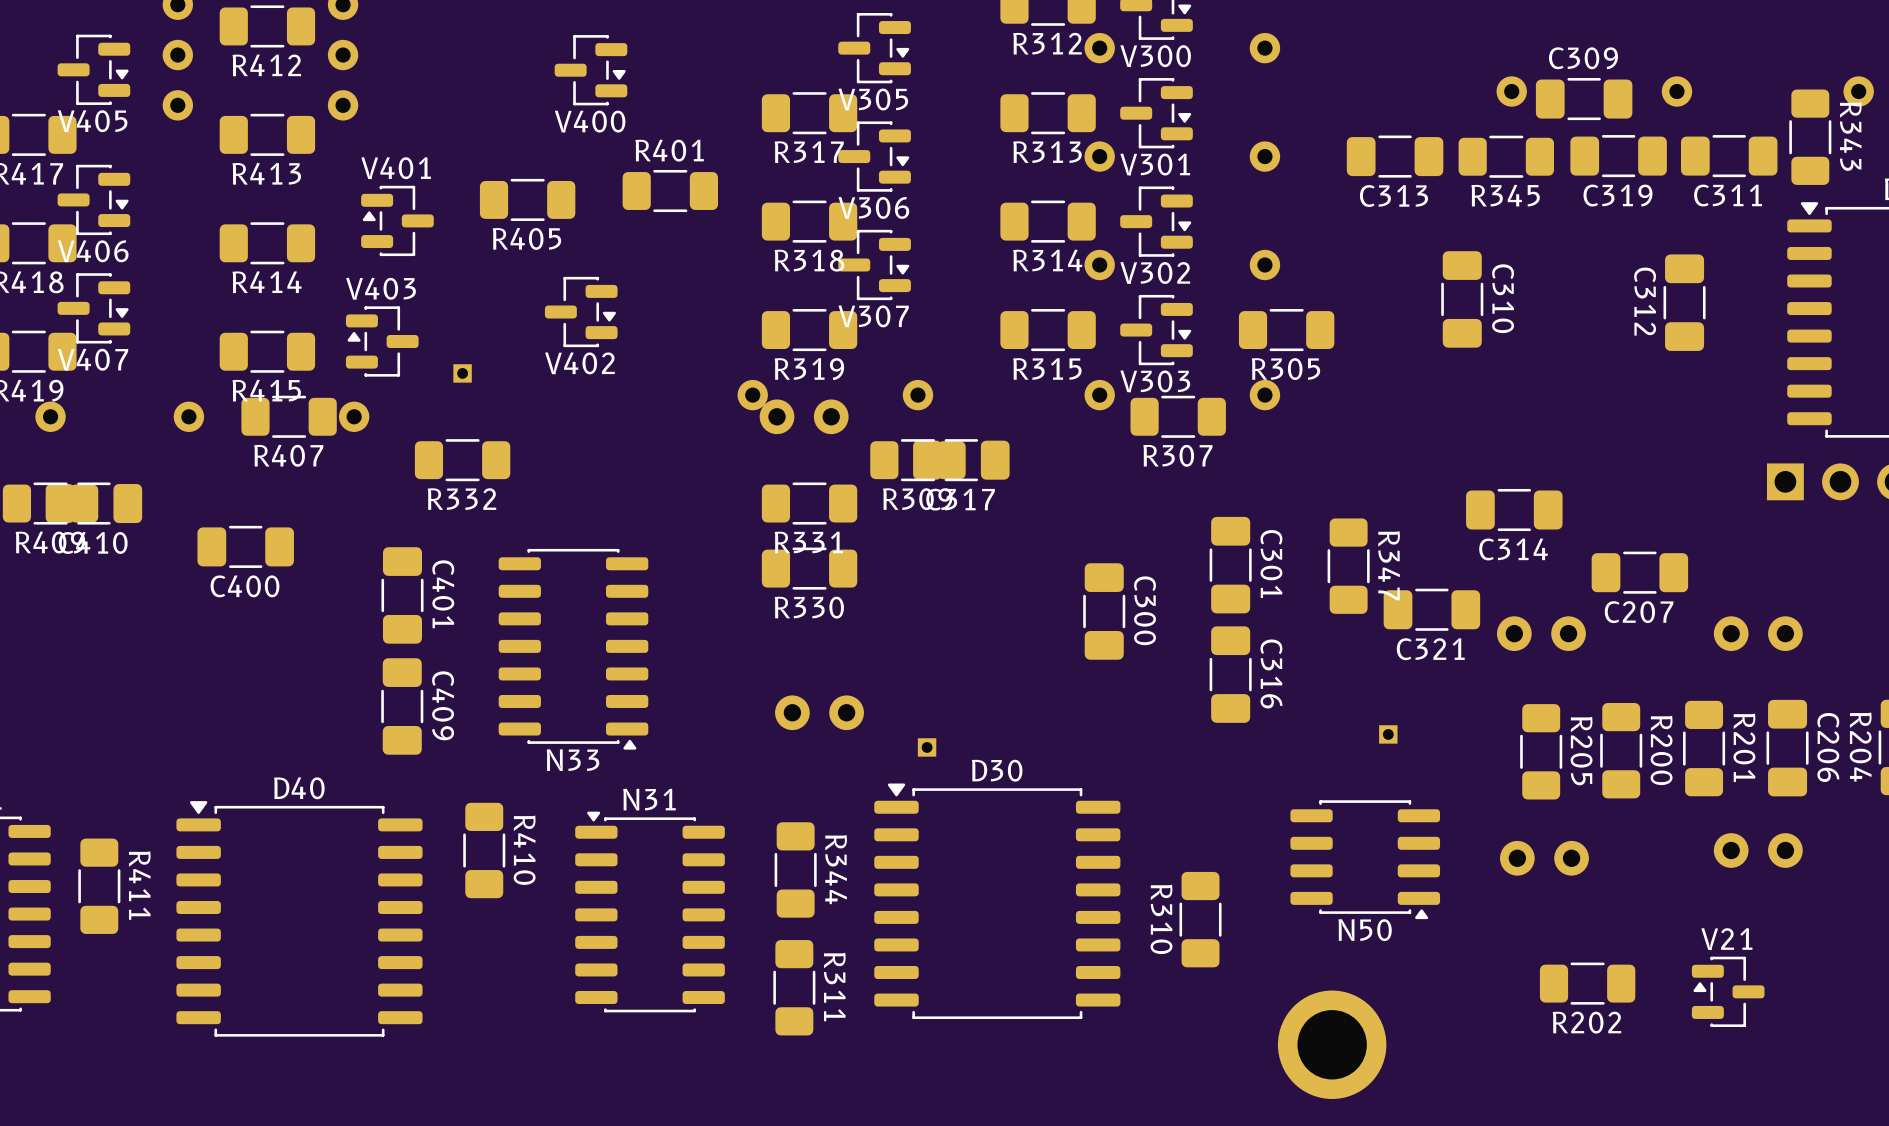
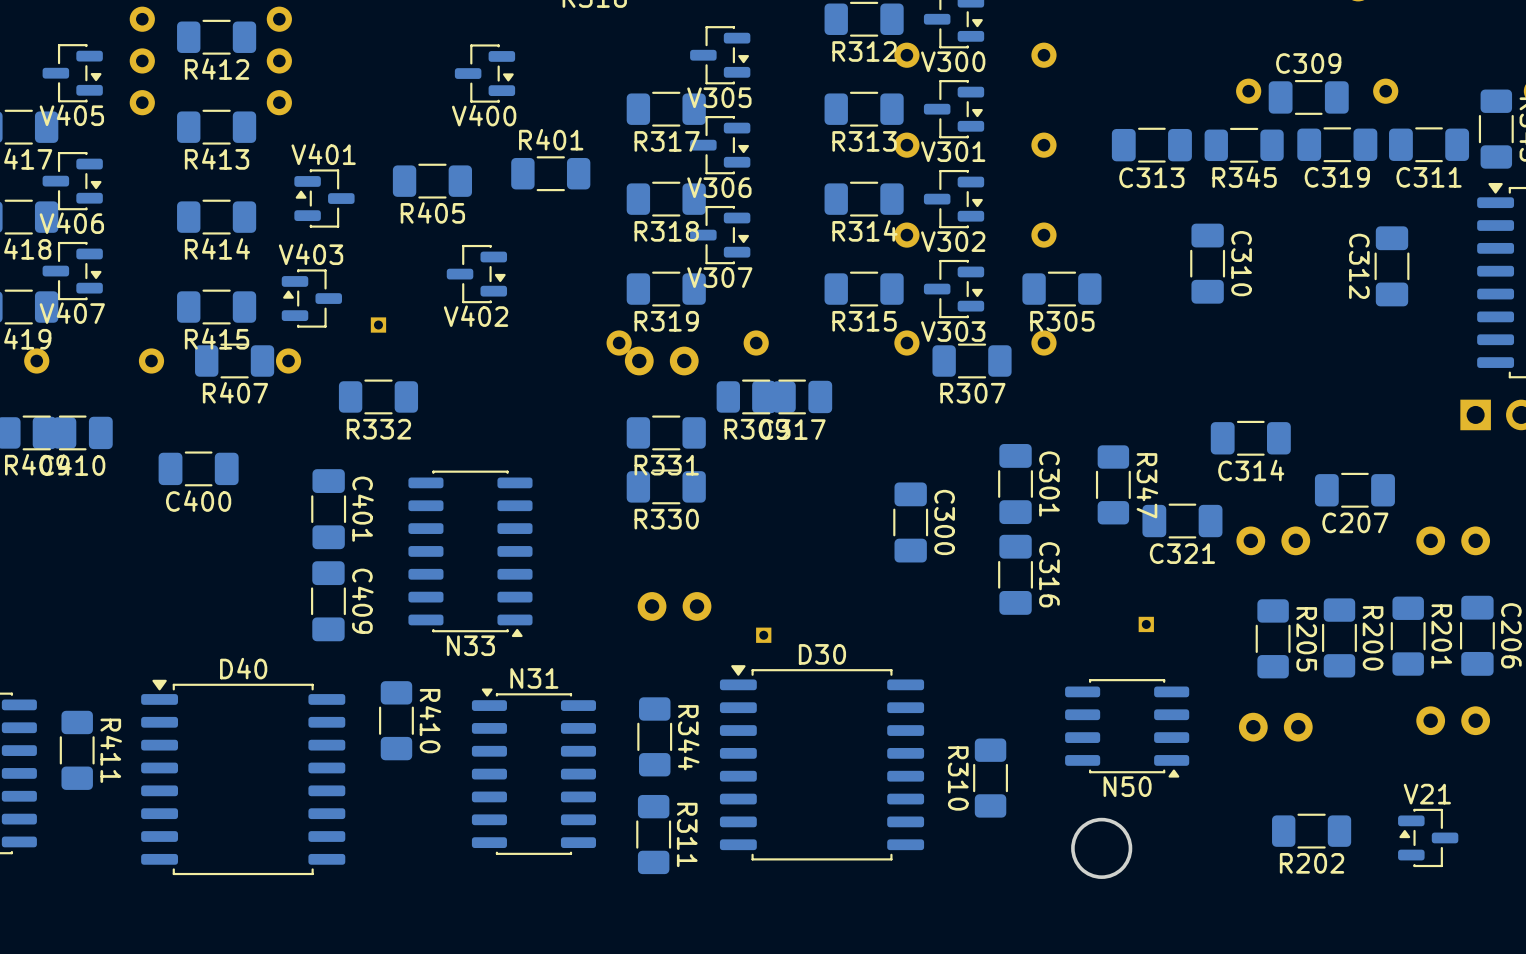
round board edge: none -> [1071, 817, 1133, 879]
part: (1332, 1044) -> none

